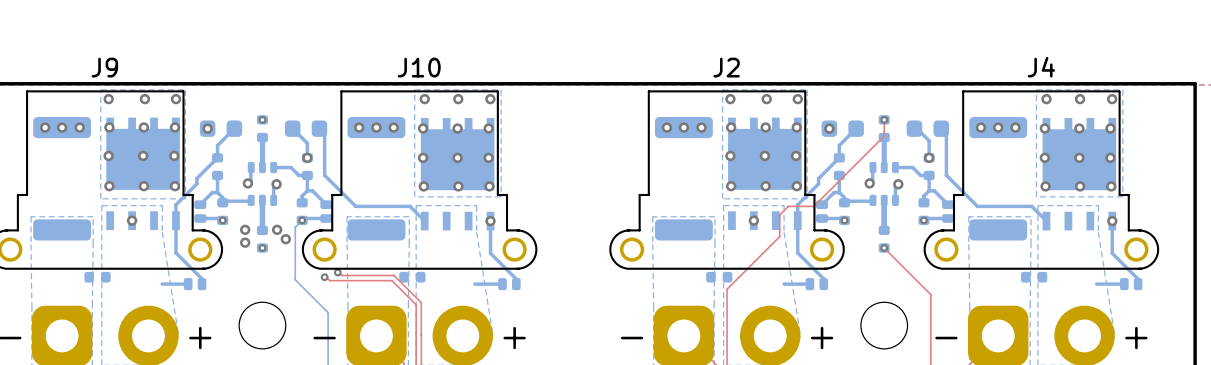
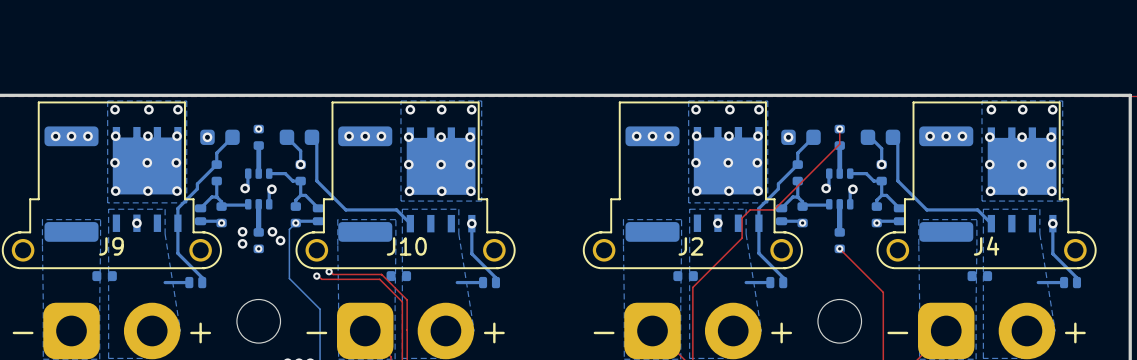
J9 name position: J9 (104, 67) -> J9 (111, 246)
J10 name position: J10 (419, 67) -> J10 (406, 246)
J2 name position: J2 (726, 67) -> J2 (690, 246)
J4 name position: J4 (1041, 67) -> J4 (986, 246)

